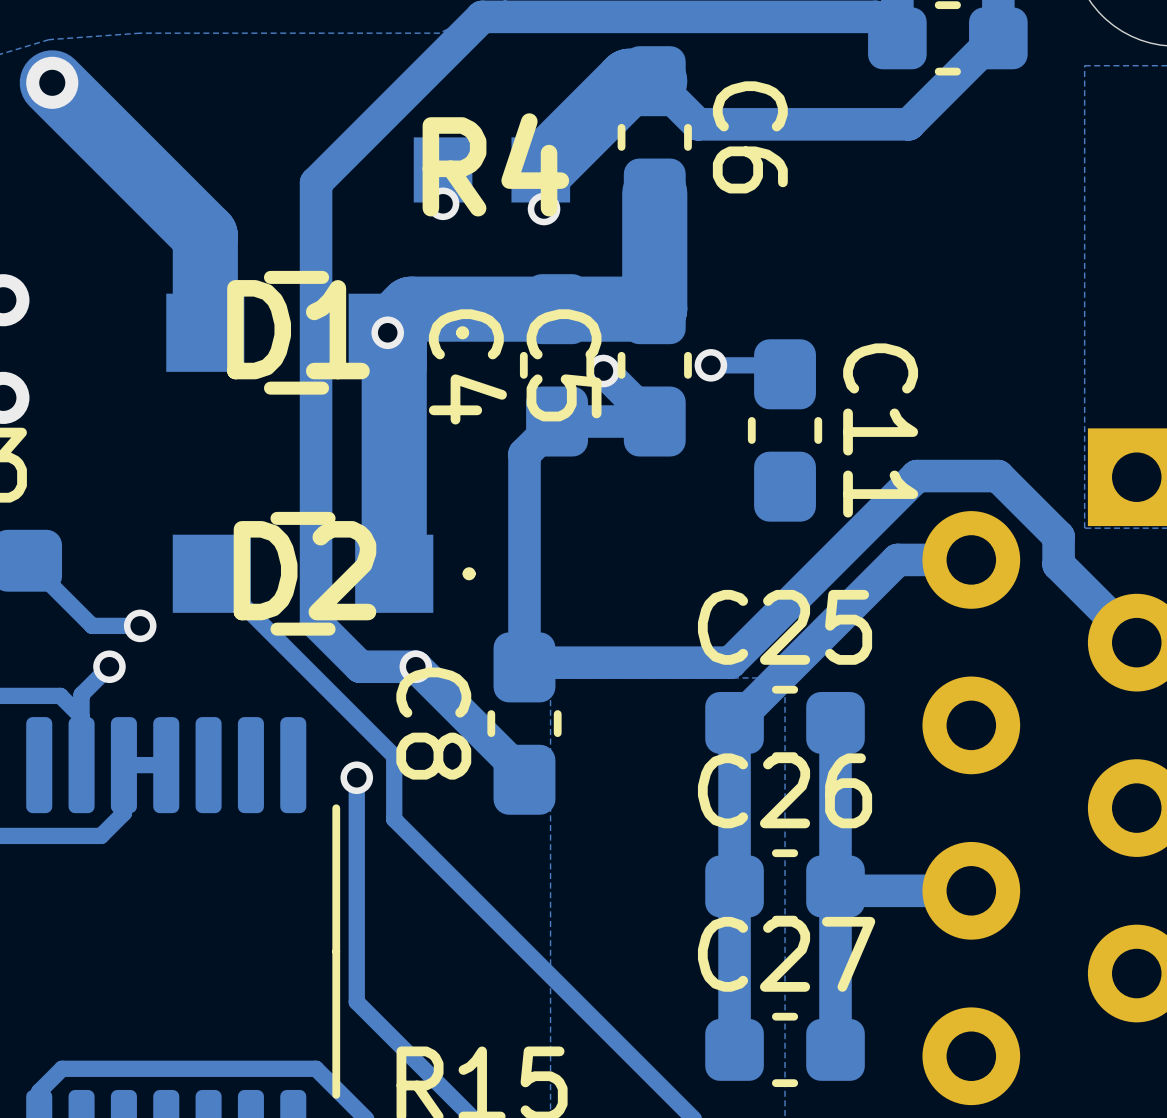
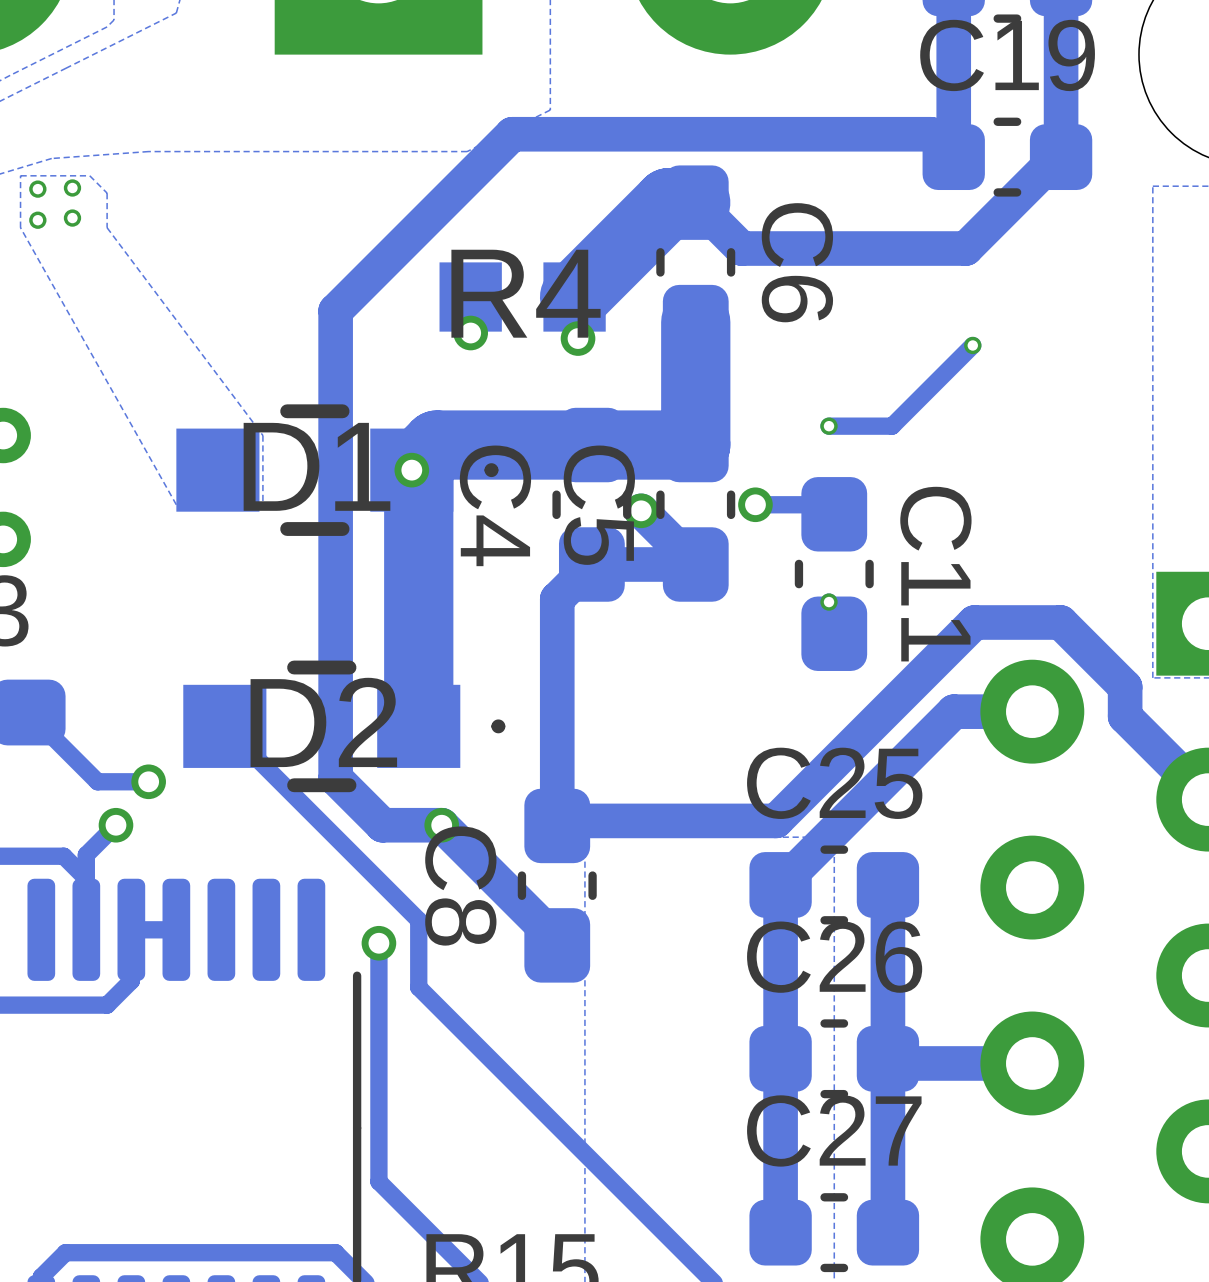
zone outline: none -> (89, 175) (20, 175) (20, 227) (176, 504) (262, 504) (262, 435) (107, 227) (107, 193) (89, 175)
via: none -> (72, 187)
via: none -> (37, 189)
track: (52, 82) (205, 235) (205, 332) -> none
via: (52, 82) -> none
via: none -> (72, 218)
via: none -> (37, 220)
track: none -> (972, 345) (892, 426) (829, 426)
via: none -> (972, 345)
via: none -> (829, 426)
via: none -> (829, 602)

